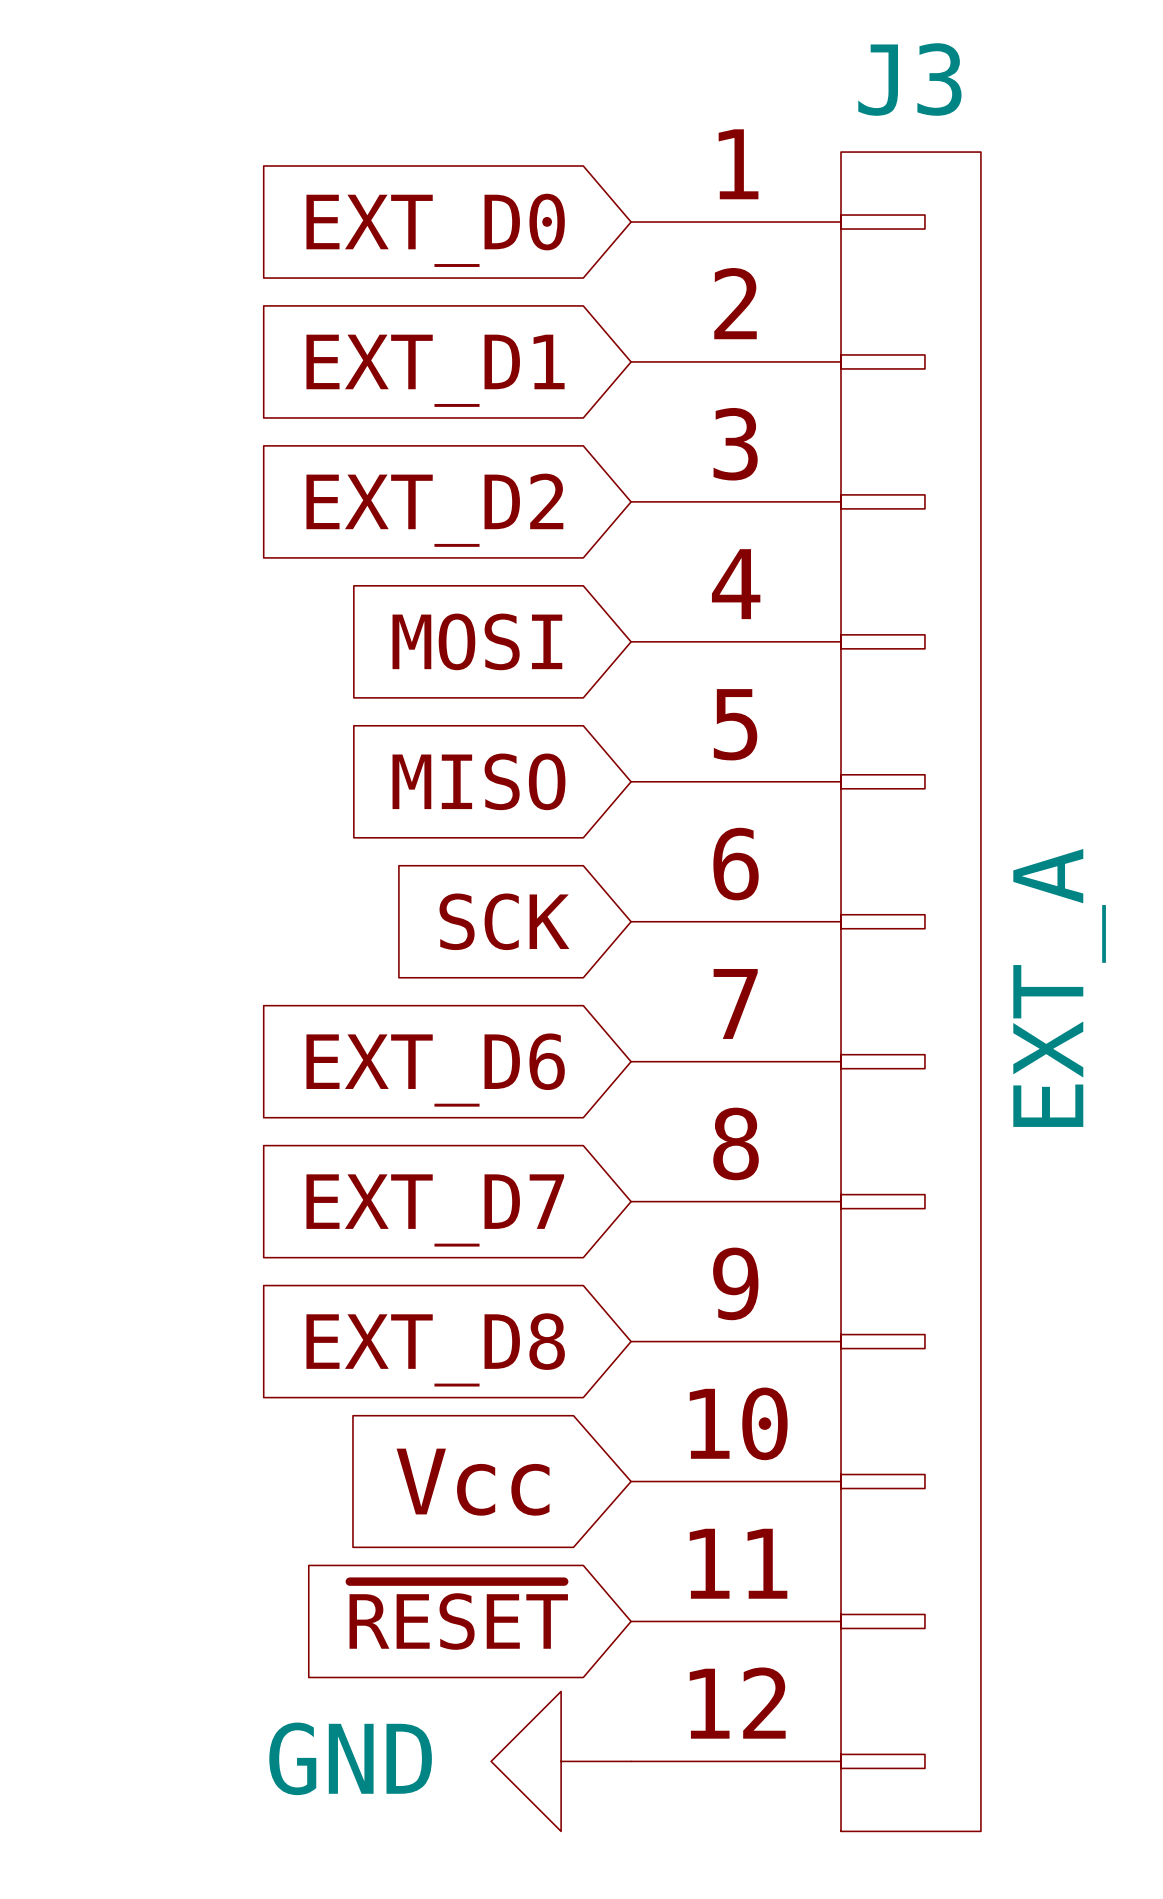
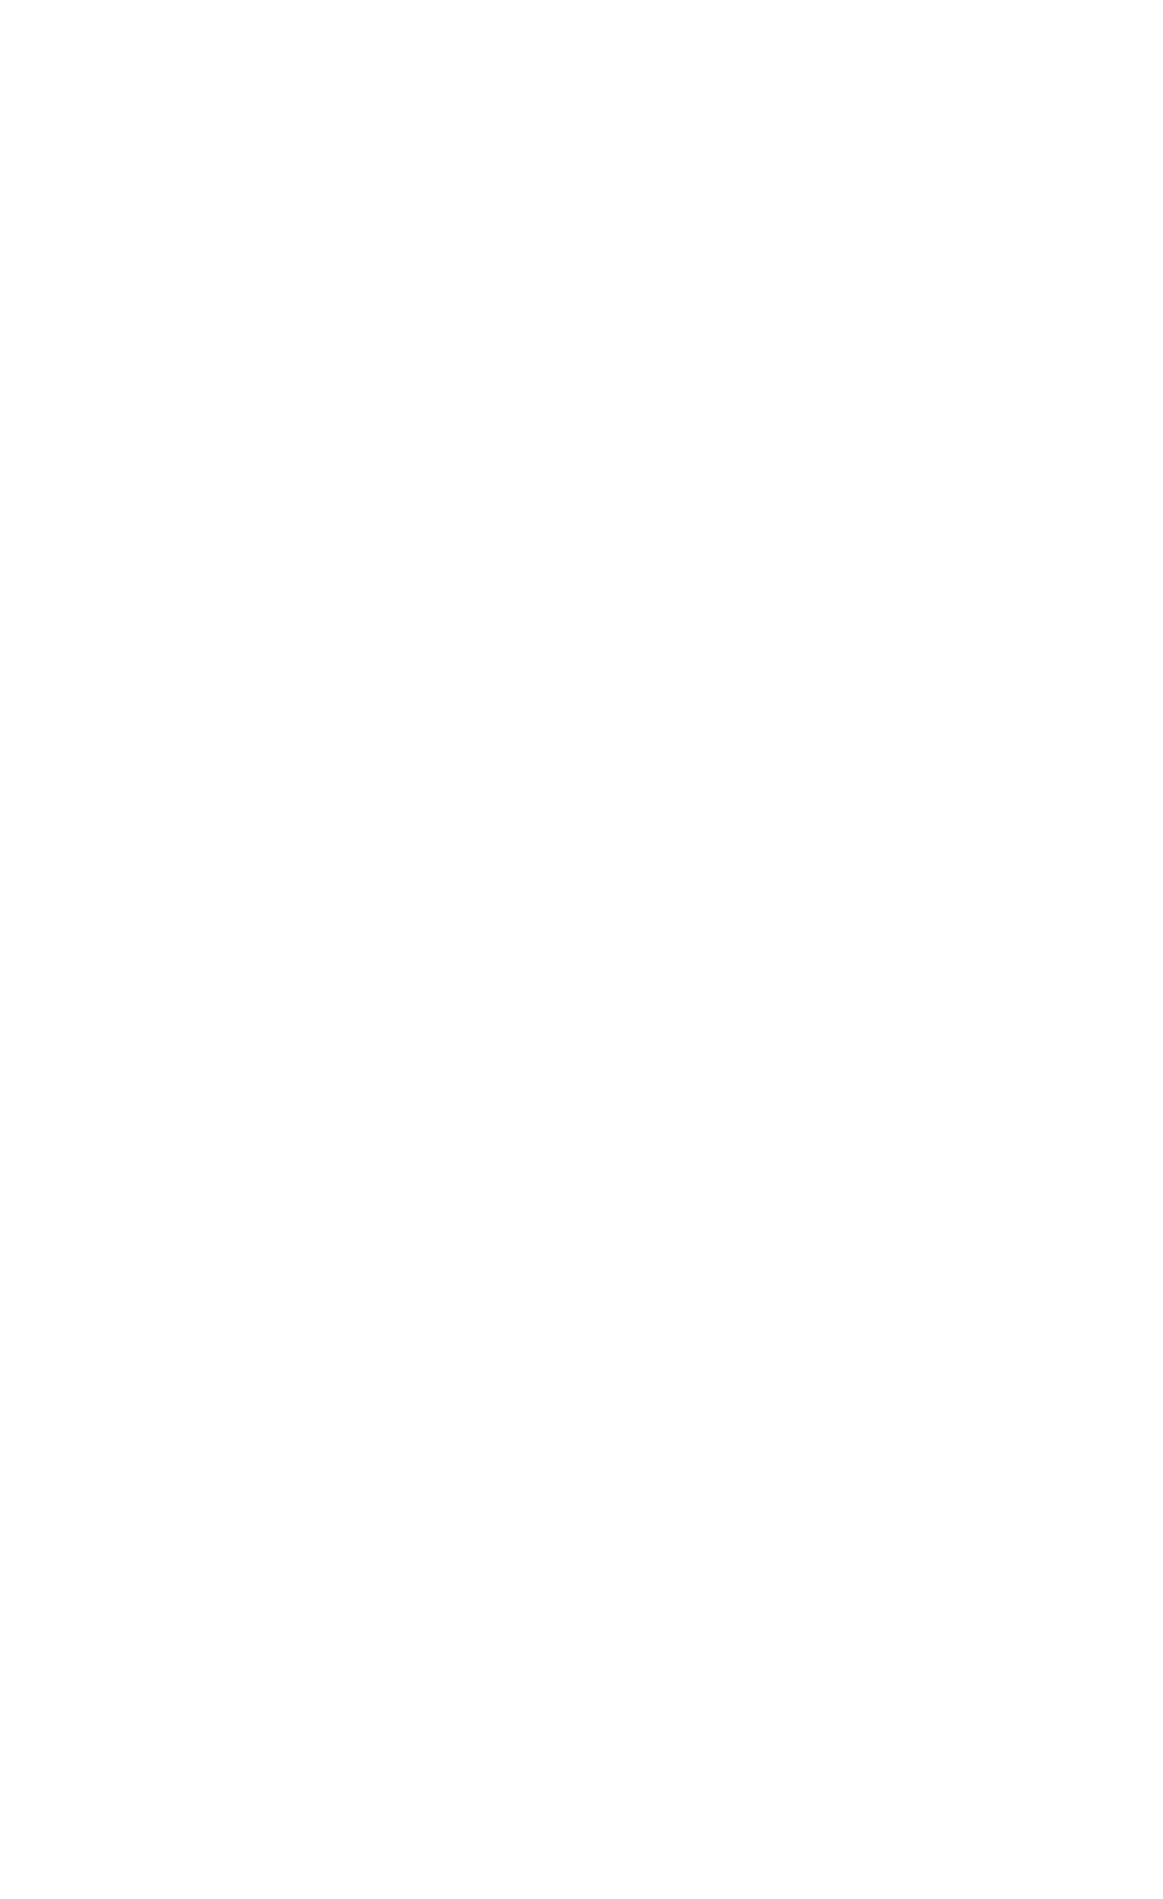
global label: EXT_D0 (435, 230) -> none
global label: EXT_D1 (435, 370) -> none
global label: EXT_D2 (434, 510) -> none
global label: MOSI (477, 641) -> none
global label: MISO (478, 781) -> none
global label: SCK (504, 921) -> none
J3: EXT_A (806, 991) -> none
global label: EXT_D6 (435, 1070) -> none
global label: EXT_D7 (435, 1210) -> none
global label: EXT_D8 (435, 1349) -> none
global label: Vcc (473, 1482) -> none
global label: ~{RESET} (458, 1615) -> none
power symbol: GND (561, 1761) -> none

